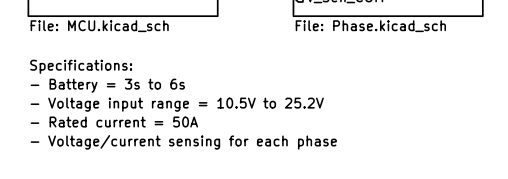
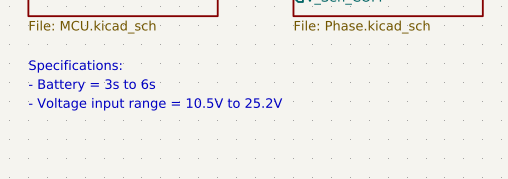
text: - Rated current = 50A (114, 122) -> none
text: - Voltage/current sensing for each phase (183, 142) -> none

